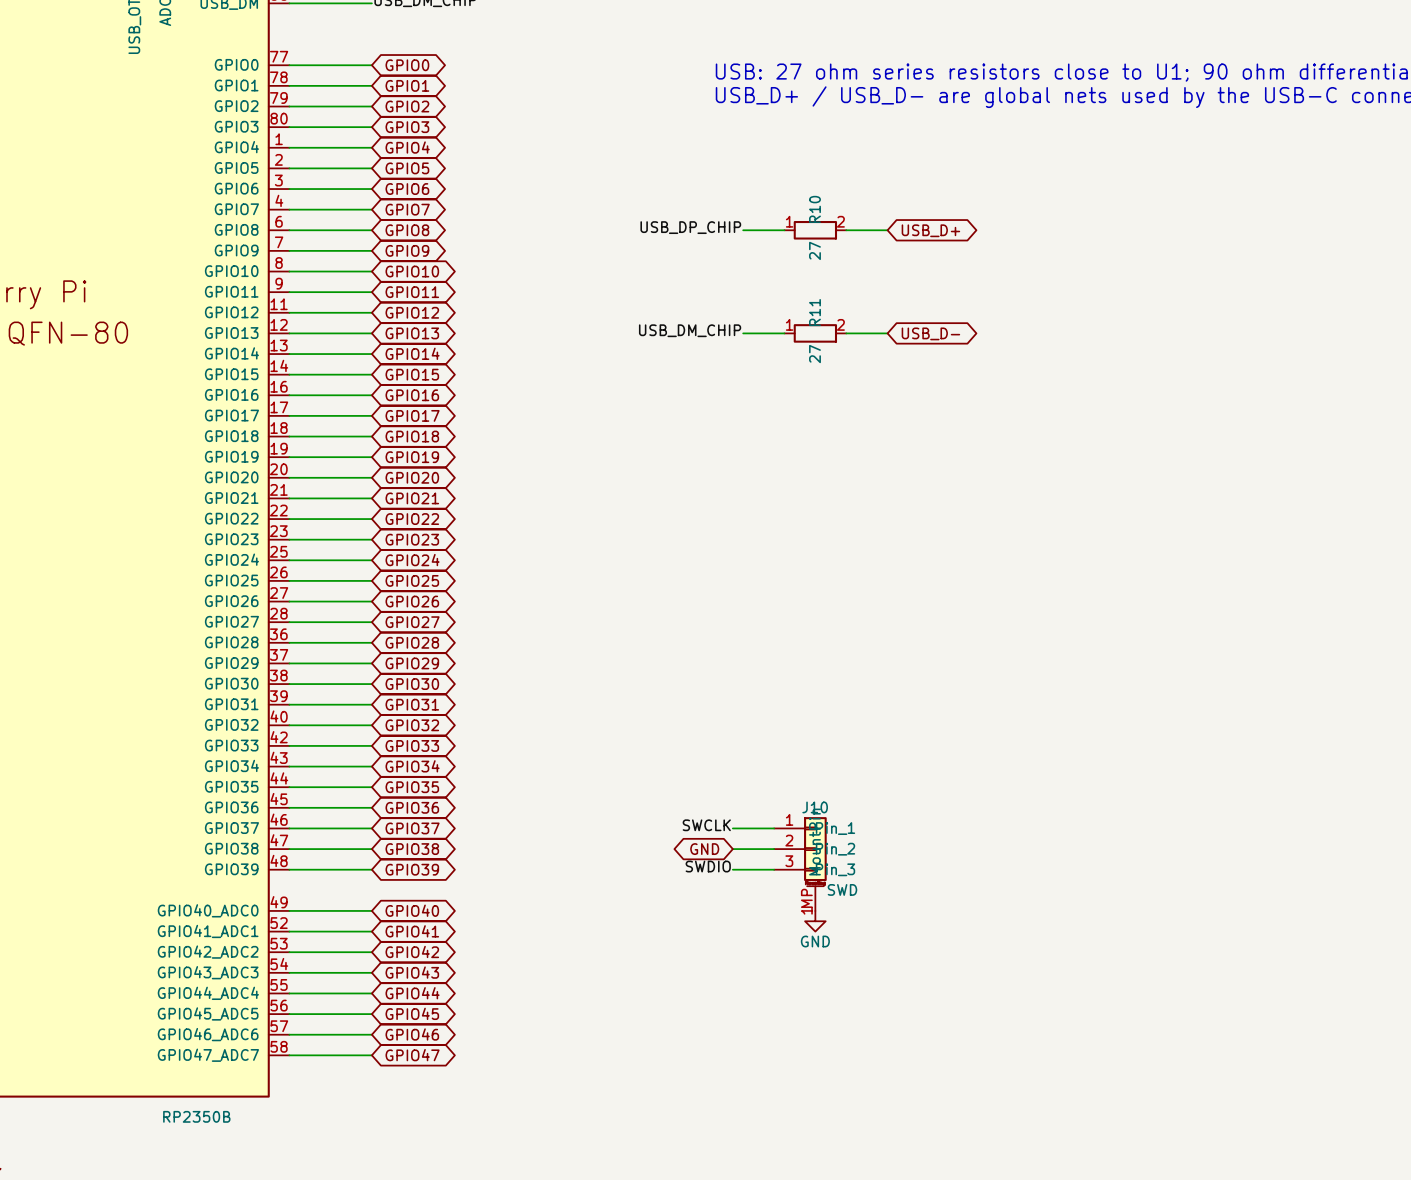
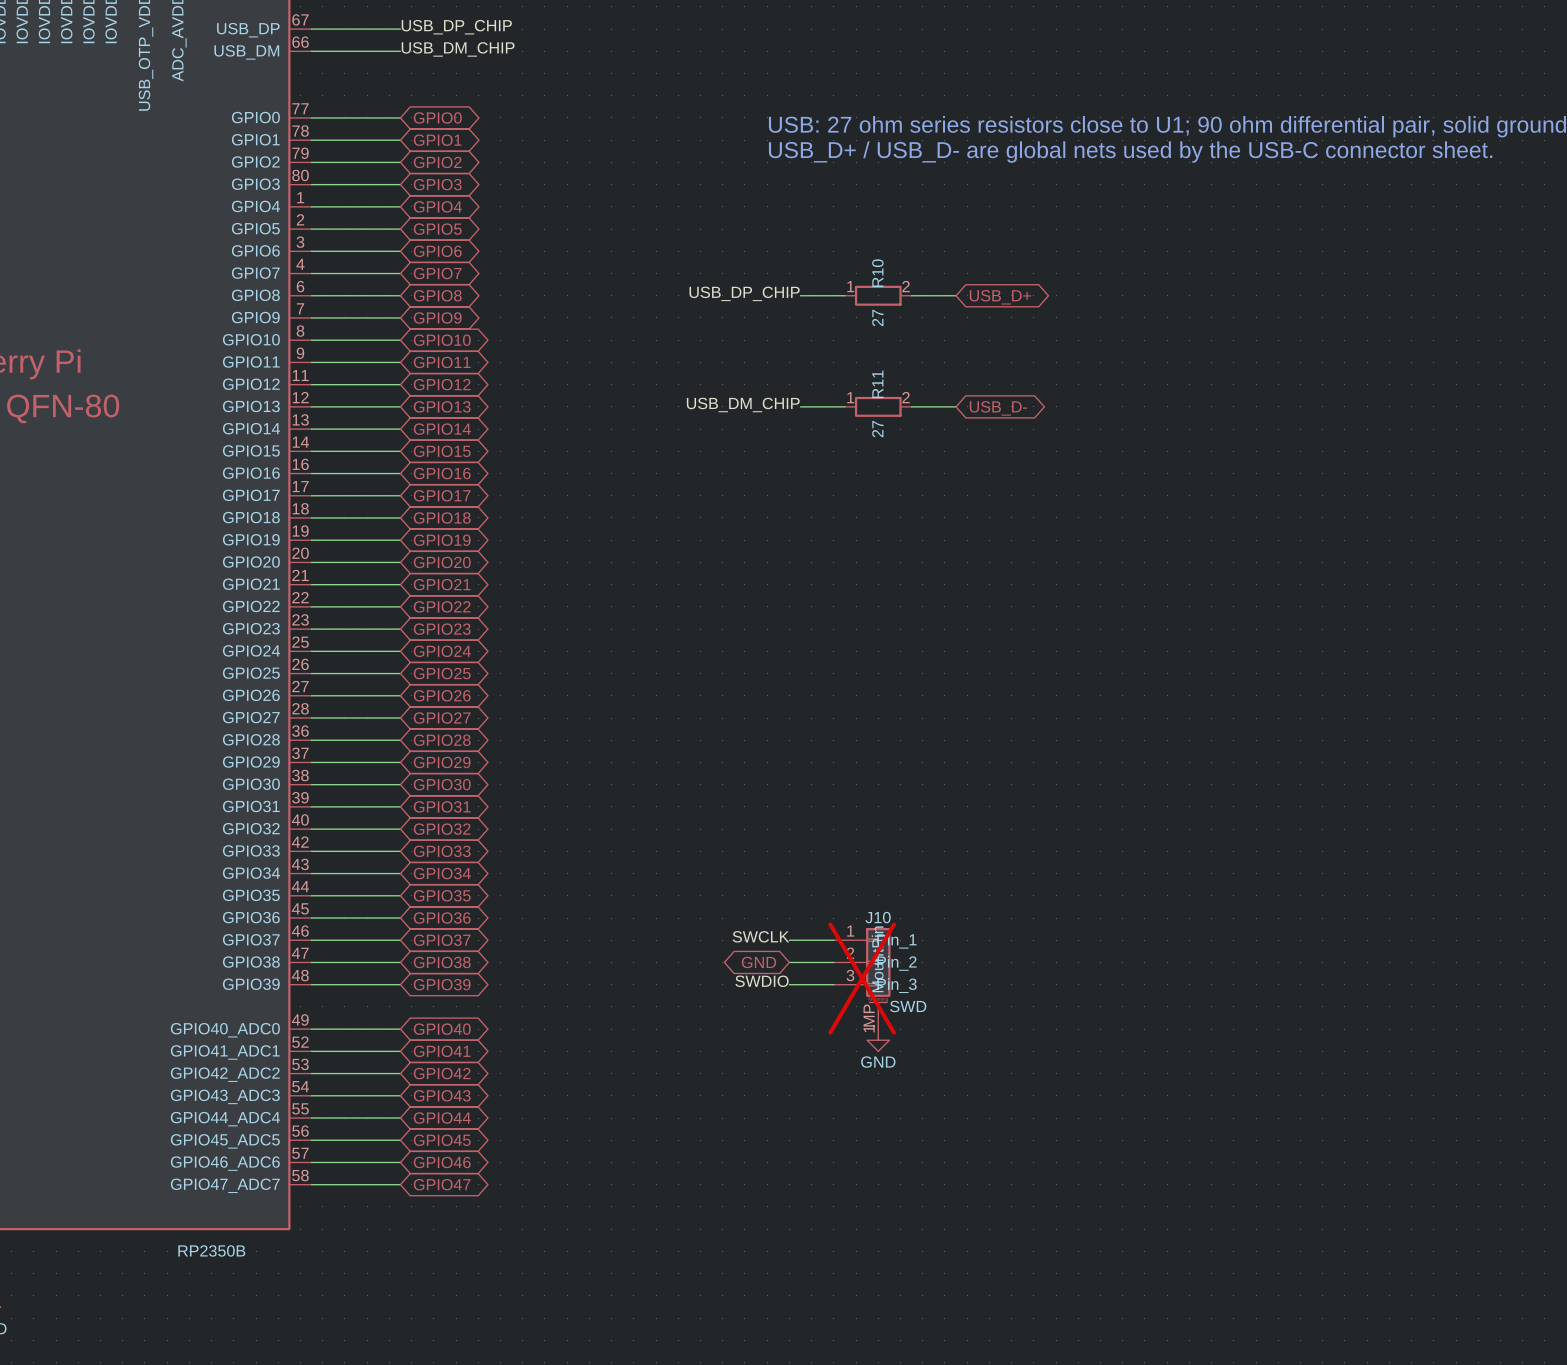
J10 do-not-place cross: none -> (862, 978)

